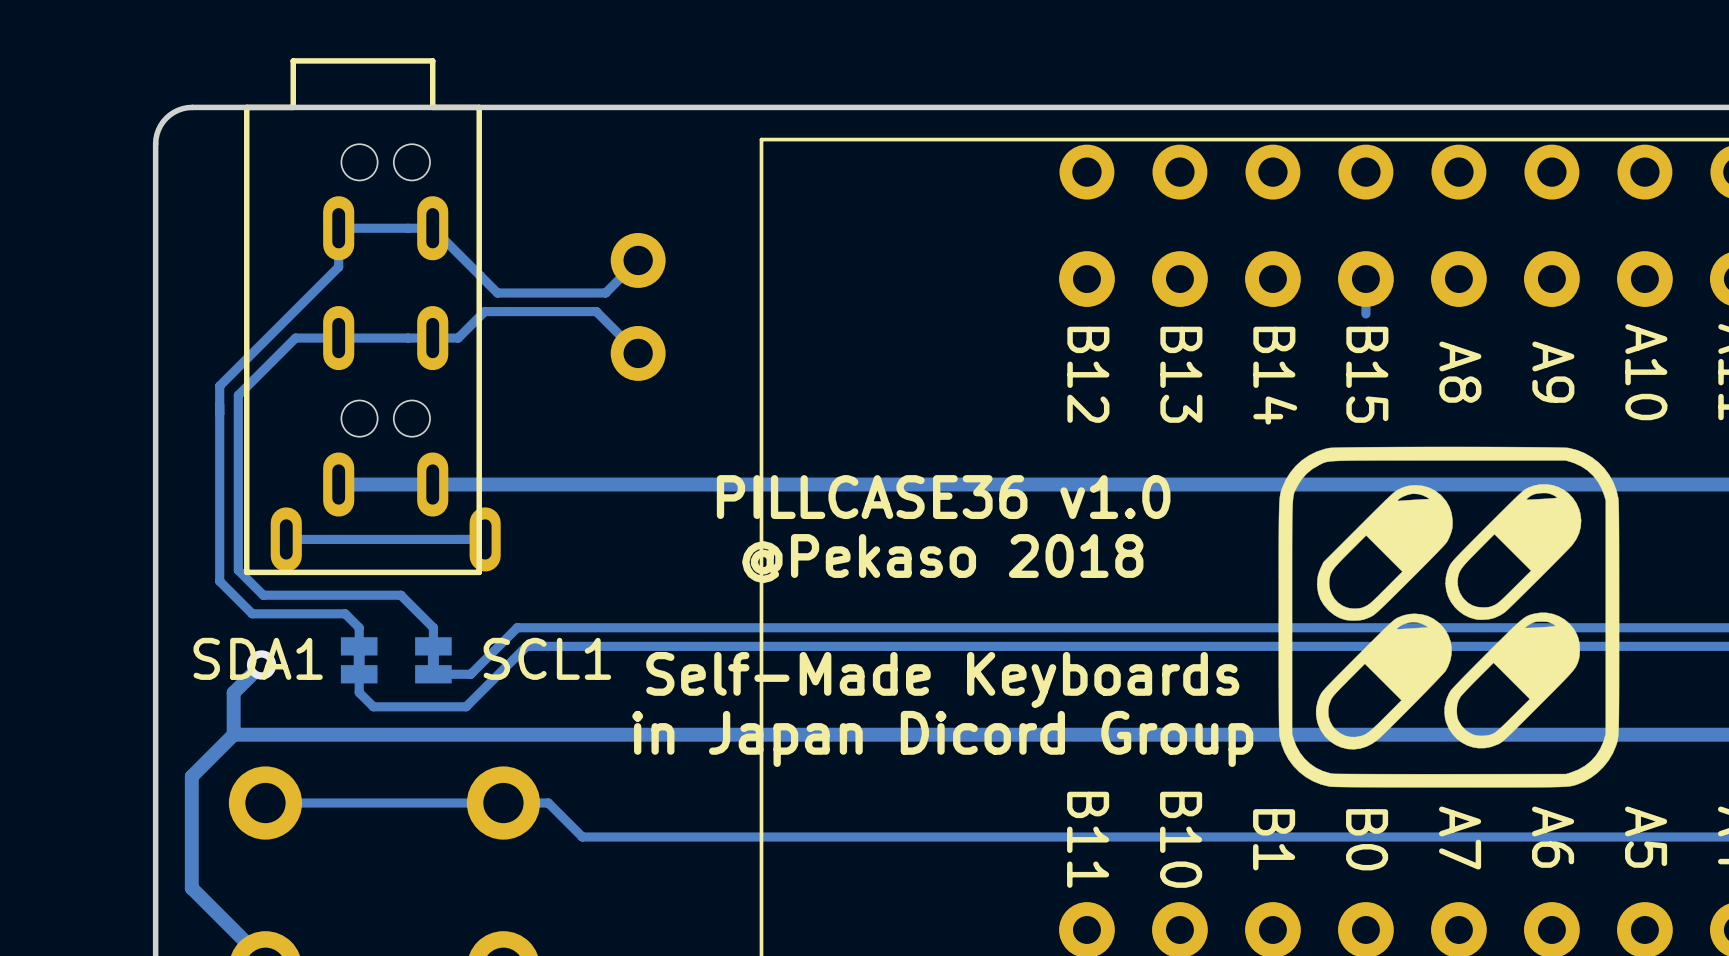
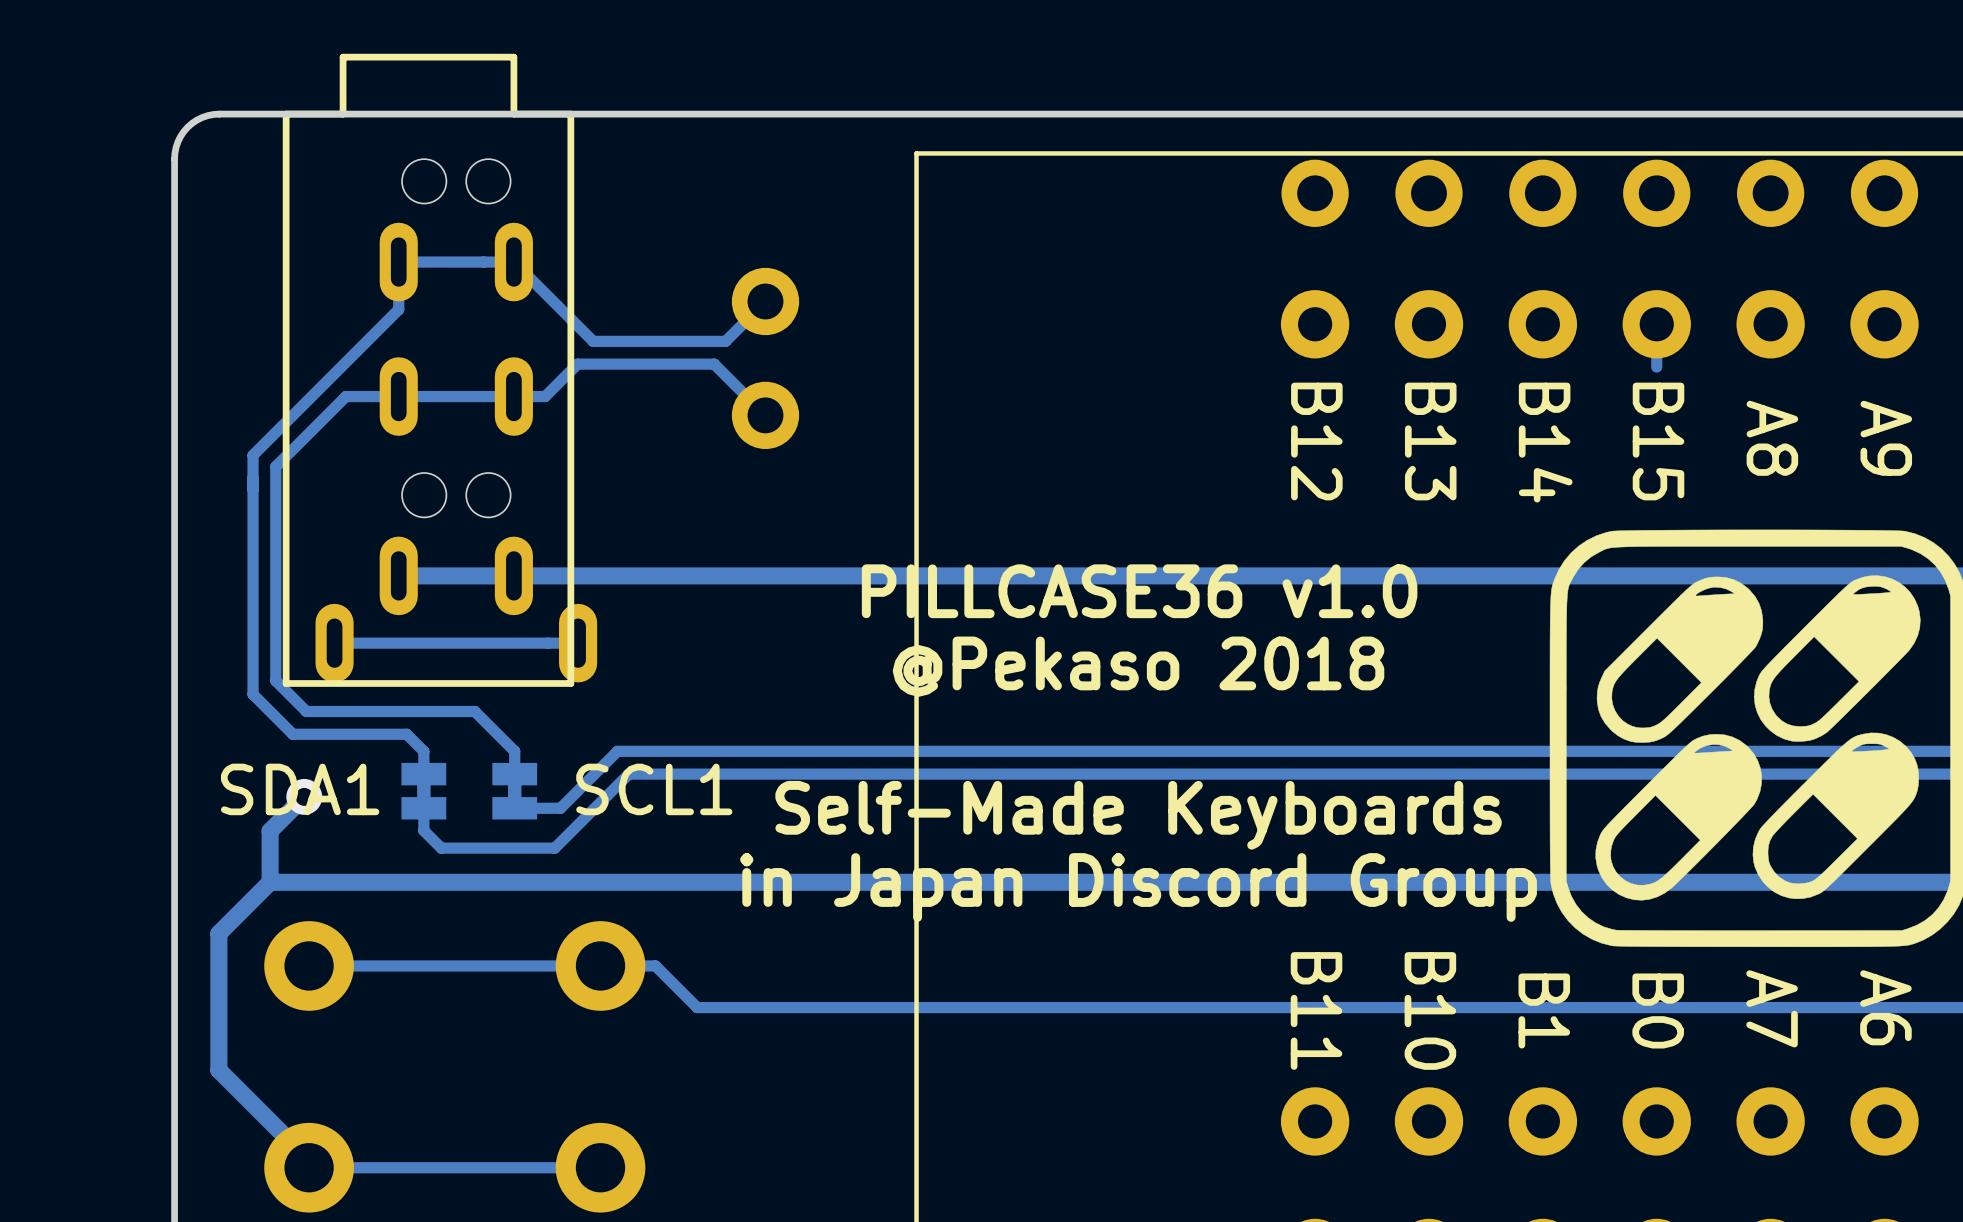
text: in Japan Dicord Group (942, 738) -> in Japan Discord Group (1138, 887)

